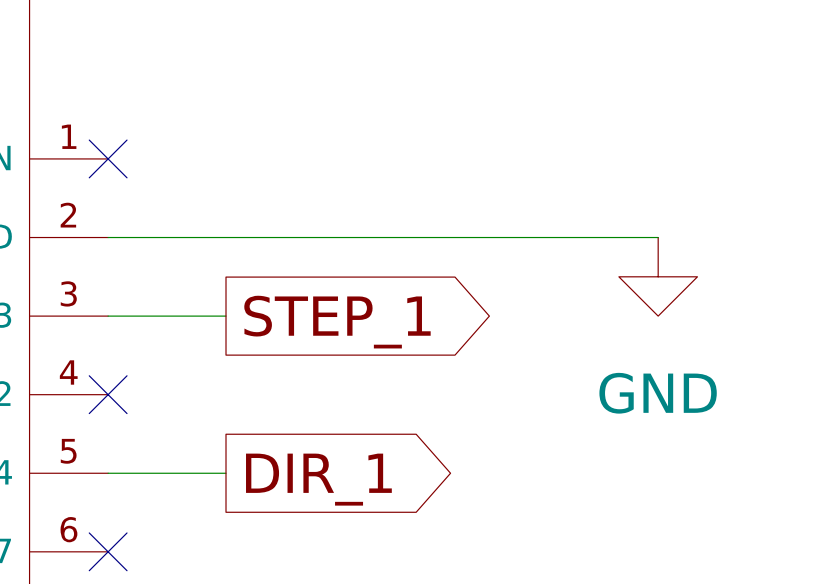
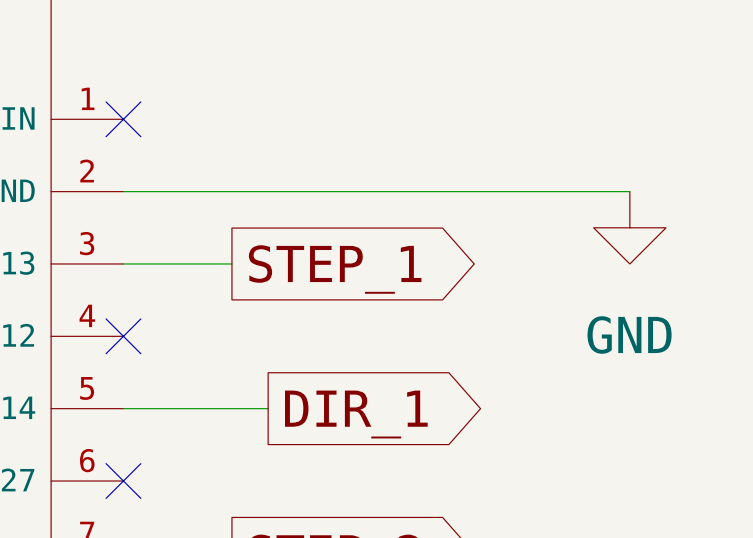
wire: none -> (231, 408) (268, 408)
global label position: DIR_1 (318, 479) -> DIR_1 (356, 414)

